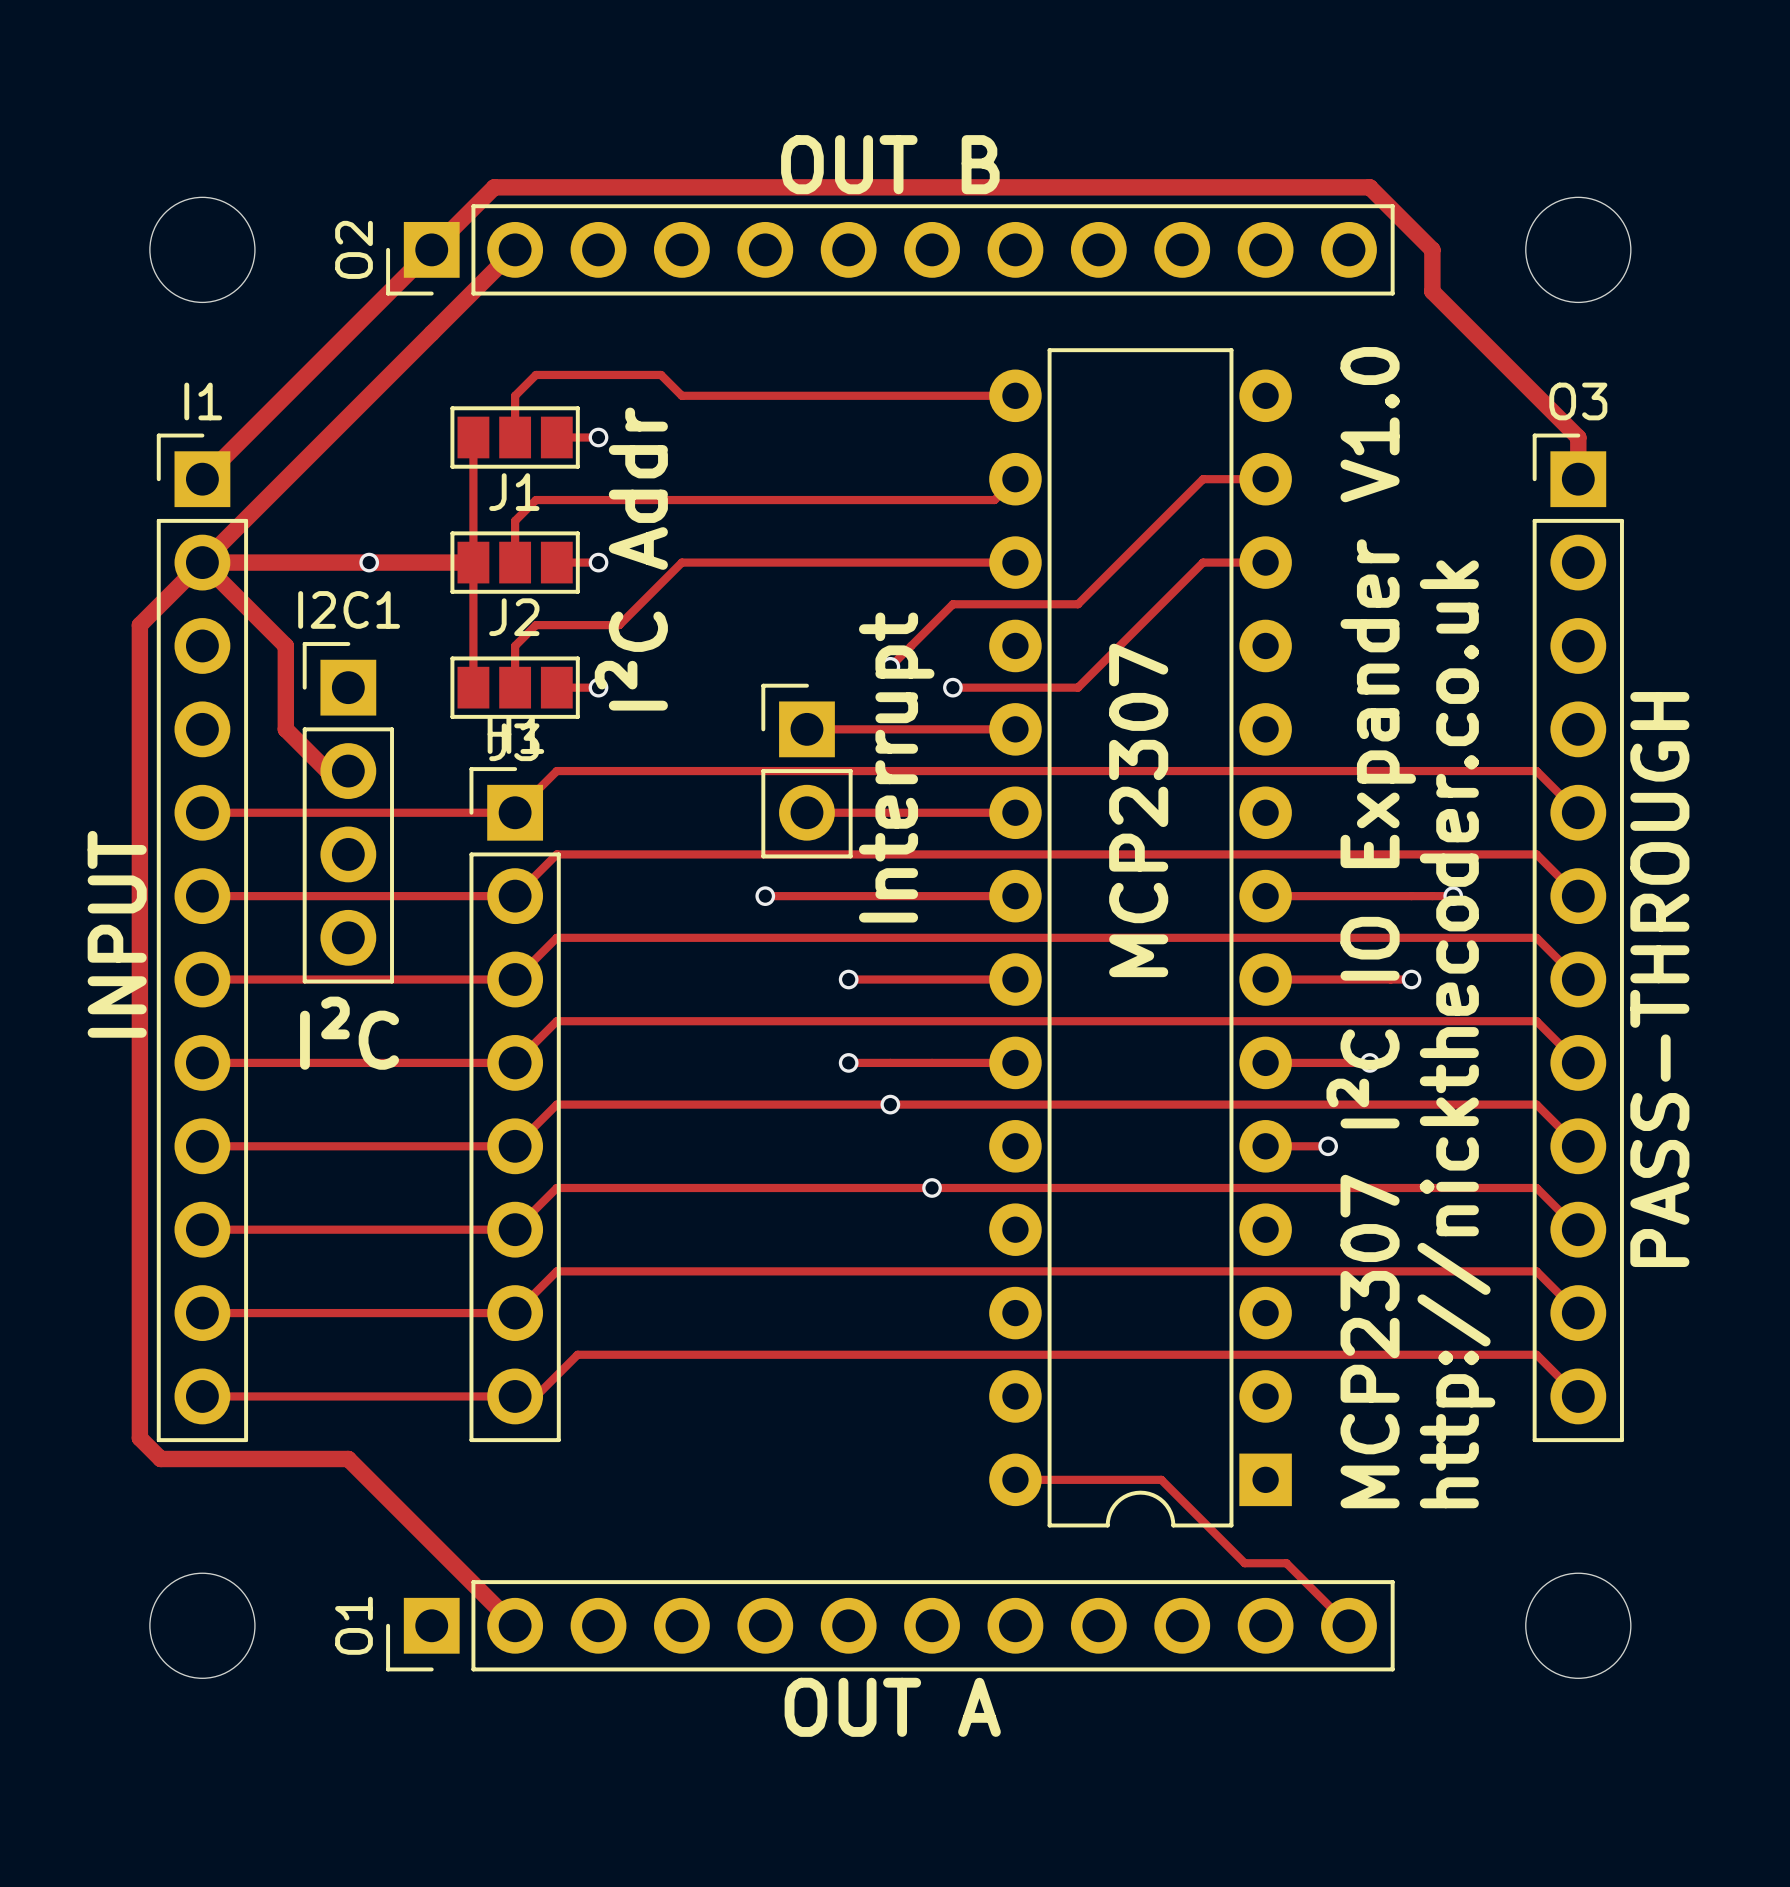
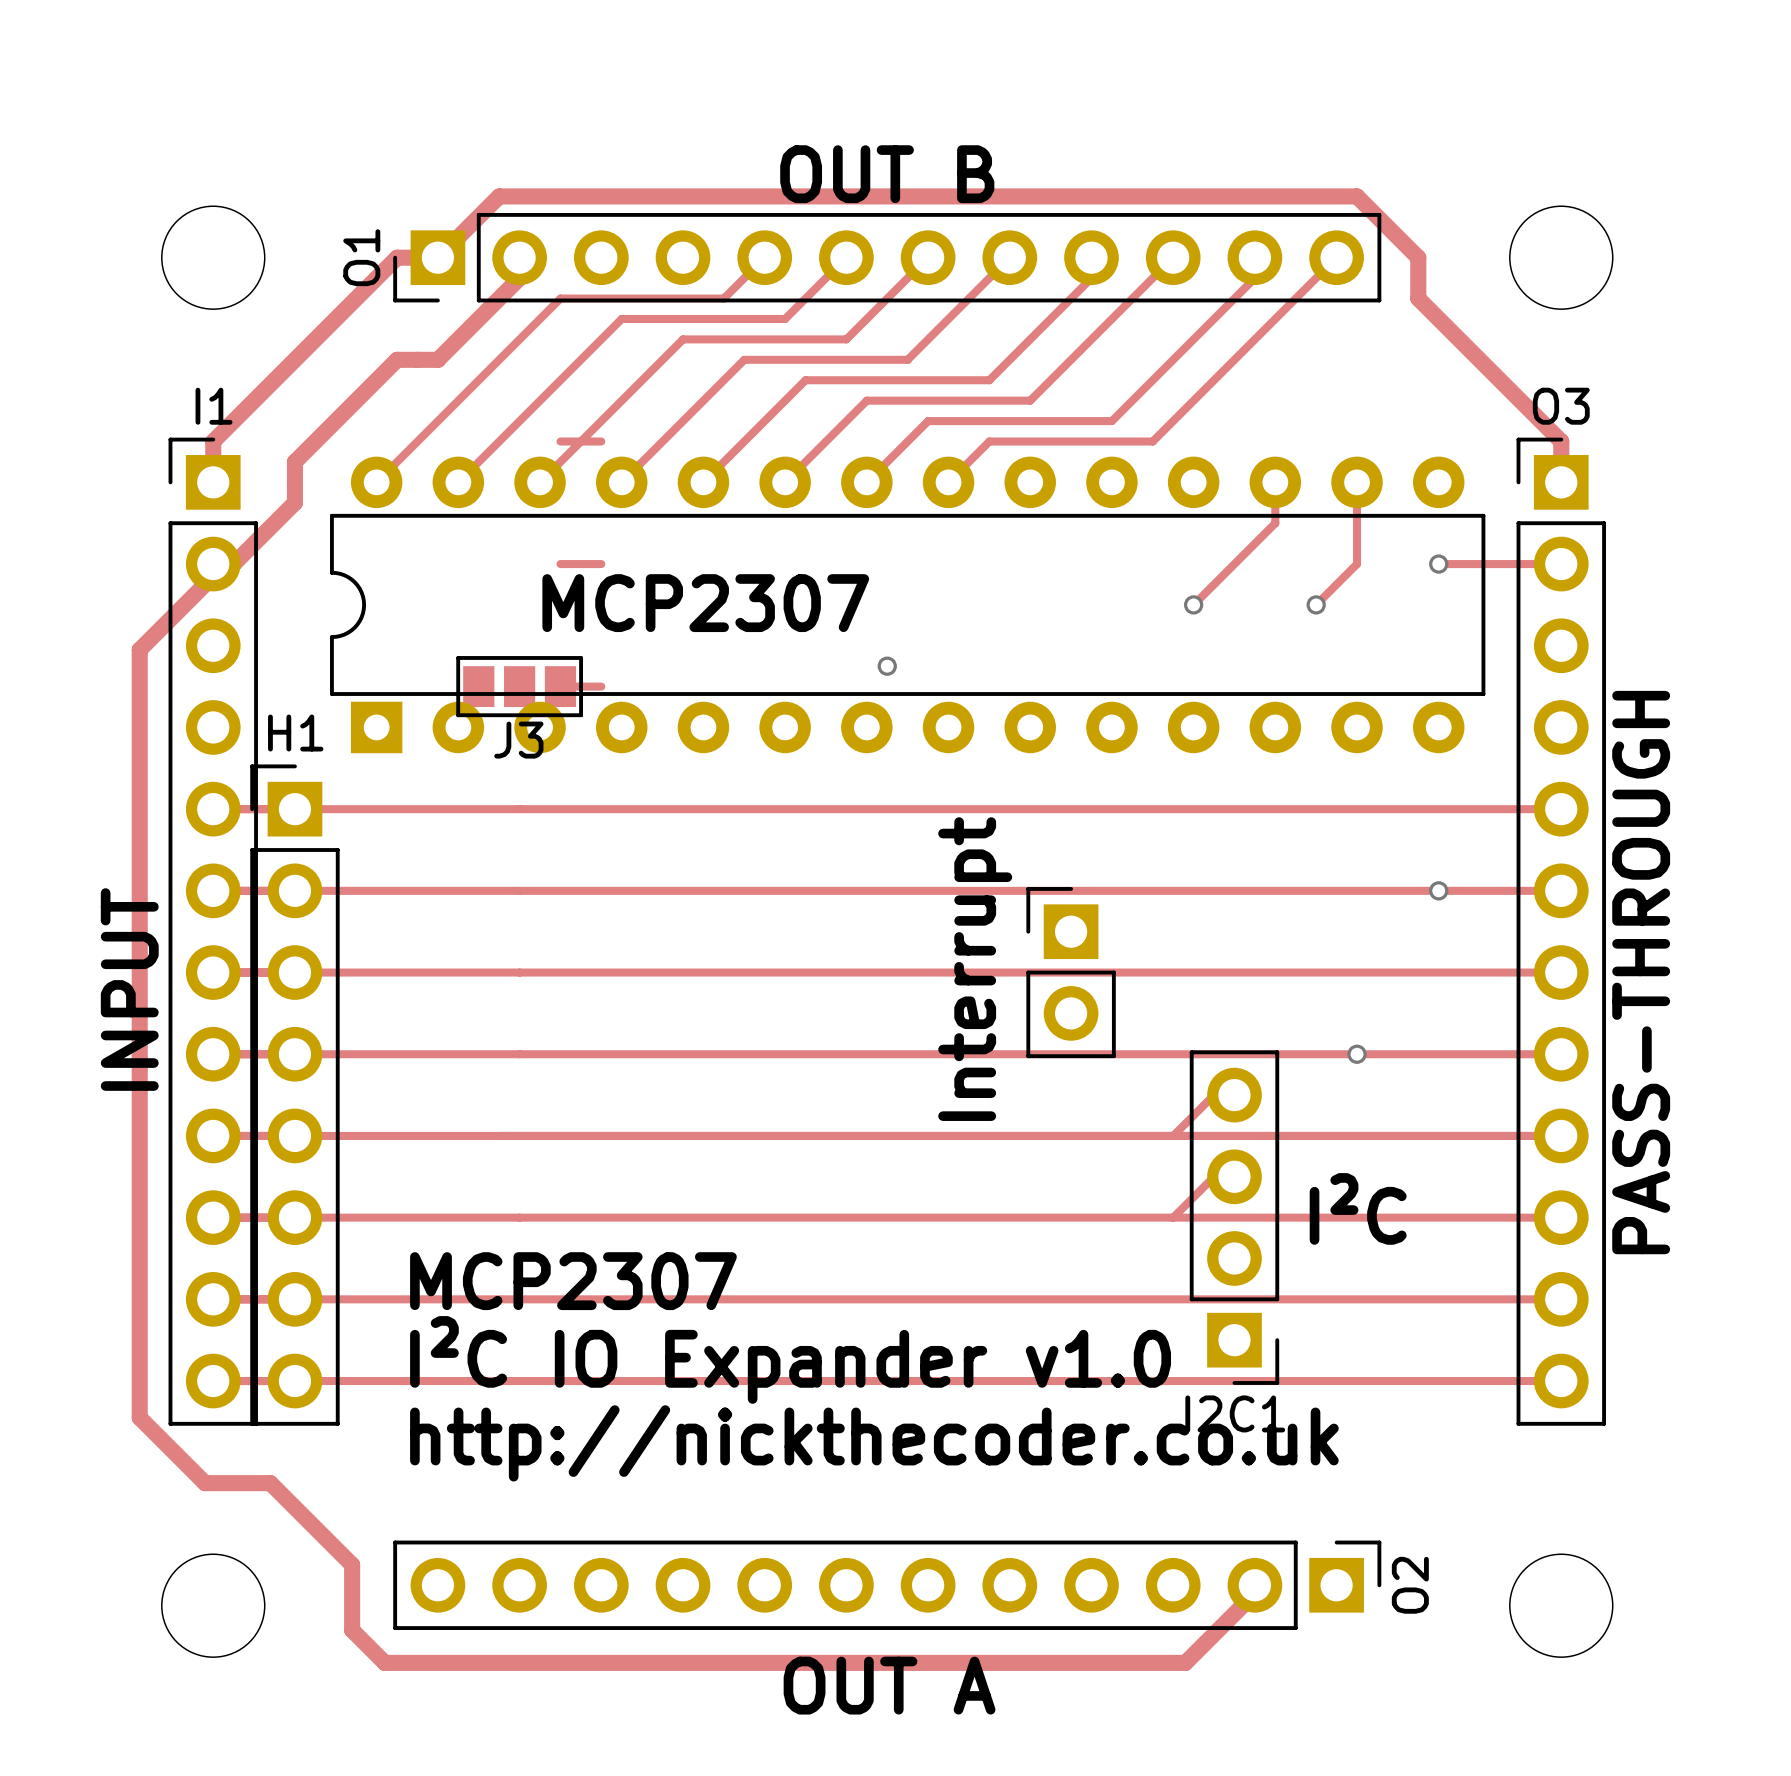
O2 name: O2 (354, 249) -> O1 (361, 257)
track: (431, 249) (202, 479) -> (437, 257) (397, 257) (213, 441) (213, 482)
track: (515, 249) (139, 625) (139, 1438) (160, 1459) (348, 1459) (515, 1625) -> none
track: none -> (764, 257) (723, 298) (560, 298) (376, 482)
track: none -> (846, 257) (785, 318) (621, 318) (458, 482)
track: none -> (928, 257) (846, 339) (683, 339) (540, 482)
track: none -> (995, 257) (1009, 257) (907, 359) (744, 359) (621, 482)
track: none -> (1091, 257) (1091, 278) (989, 380) (805, 380) (703, 482)
track: none -> (1173, 257) (1030, 400) (1009, 400)
track: none -> (1254, 257) (1254, 278) (1111, 421) (928, 421) (866, 482)
track: none -> (1336, 257) (1152, 441) (989, 441) (948, 482)
track: (869, 395) (681, 395) (661, 374) (535, 374) (515, 395) (515, 437) -> (866, 400) (785, 482)
track: (473, 437) (473, 687) -> none
J1: (515, 437) -> none
via: (598, 437) -> none
track: (1015, 479) (994, 500) (535, 500) (515, 520) (515, 562) -> none
track: (1265, 479) (1203, 479) (1077, 604) (952, 604) (890, 666) -> none
track: none -> (1275, 482) (1275, 523) (1193, 604)
track: none -> (1357, 482) (1357, 564) (1316, 604)
text: I²C Addr (631, 559) -> none
track: (202, 562) (285, 645) (285, 729) (327, 771) (348, 771) -> (213, 564) (213, 576) (139, 649) (139, 1417) (205, 1483) (270, 1483) (352, 1564) (352, 1630) (384, 1662) (1185, 1662) (1250, 1597)
track: (223, 562) (473, 562) -> (233, 564) (294, 502) (294, 461) (397, 359) (437, 359) (519, 278) (519, 257)
via: (369, 562) -> none
J2: (515, 562) -> none
via: (598, 562) -> none
track: (1015, 562) (681, 562) (619, 625) (535, 625) (515, 645) (515, 687) -> none
track: (1265, 562) (1203, 562) (1077, 687) (952, 687) -> none
track: none -> (1438, 564) (1561, 564)
via: none -> (1438, 564)
text: none -> MCP2307 (705, 603)
via: none -> (1193, 604)
via: none -> (1316, 604)
via: (598, 687) -> none
via: (952, 687) -> none
track: (806, 729) (1015, 729) -> none
text position: Interrupt (896, 767) -> Interrupt (975, 969)
part position: (806, 771) -> (1071, 972)
text: MCP2307 (1138, 810) -> none
I2C1 rotation: 0° (348, 812) -> 180° (1234, 1217)
I2C1 position: (348, 812) -> (1234, 1217)
track: (515, 812) (556, 771) (1536, 771) (1578, 812) -> (1009, 809) (1561, 809)
track: none -> (519, 809) (805, 809)
track: (515, 896) (556, 854) (1536, 854) (1578, 896) -> (1438, 890) (1561, 890)
track: none -> (540, 890) (764, 890)
via: (765, 896) -> none
track: none -> (1009, 890) (1254, 890)
text: MCP2307 I²C IO Expander V1.0 (1371, 927) -> none
text position: INPUT (117, 934) -> INPUT (129, 989)
part rotation: 0° (1140, 937) -> 90° clockwise (907, 604)
track: (515, 979) (556, 937) (1536, 937) (1578, 979) -> (519, 972) (846, 972)
via: (848, 979) -> none
track: none -> (1009, 972) (1254, 972)
track: none -> (1397, 972) (1561, 972)
via: (1411, 979) -> none
text: I²C (349, 1033) -> none
text: http://nickthecoder.co.uk (1456, 1034) -> none
track: (515, 1062) (556, 1021) (1536, 1021) (1578, 1062) -> (1357, 1054) (1561, 1054)
track: none -> (540, 1054) (846, 1054)
via: (848, 1062) -> none
track: none -> (1009, 1054) (1254, 1054)
H1 position: (515, 1104) -> (294, 1095)
via: (890, 1104) -> none
track: (1223, 1104) (556, 1104) (515, 1146) -> (1254, 1135) (519, 1135)
track: none -> (1214, 1095) (1173, 1135)
track: (1244, 1104) (1536, 1104) (1578, 1146) -> (1316, 1135) (1561, 1135)
via: (1328, 1146) -> none
via: (932, 1187) -> none
track: (1223, 1187) (556, 1187) (515, 1229) -> (1561, 1217) (519, 1217)
track: none -> (1214, 1176) (1173, 1217)
track: (1244, 1187) (1536, 1187) (1578, 1229) -> none
text: none -> I²C (1358, 1208)
text: none -> MCP2307 (573, 1281)
track: (515, 1313) (556, 1271) (1536, 1271) (1578, 1313) -> (519, 1299) (1561, 1299)
text: none -> I²C IO Expander v1.0 (790, 1359)
track: (535, 1396) (577, 1354) (1536, 1354) (1578, 1396) -> (540, 1381) (1561, 1381)
text: none -> http://nickthecoder.co.uk (874, 1443)
track: (1015, 1479) (1161, 1479) (1244, 1563) (1286, 1563) (1349, 1625) -> none
O2: none -> (887, 1585)
O1: (890, 1625) -> none

